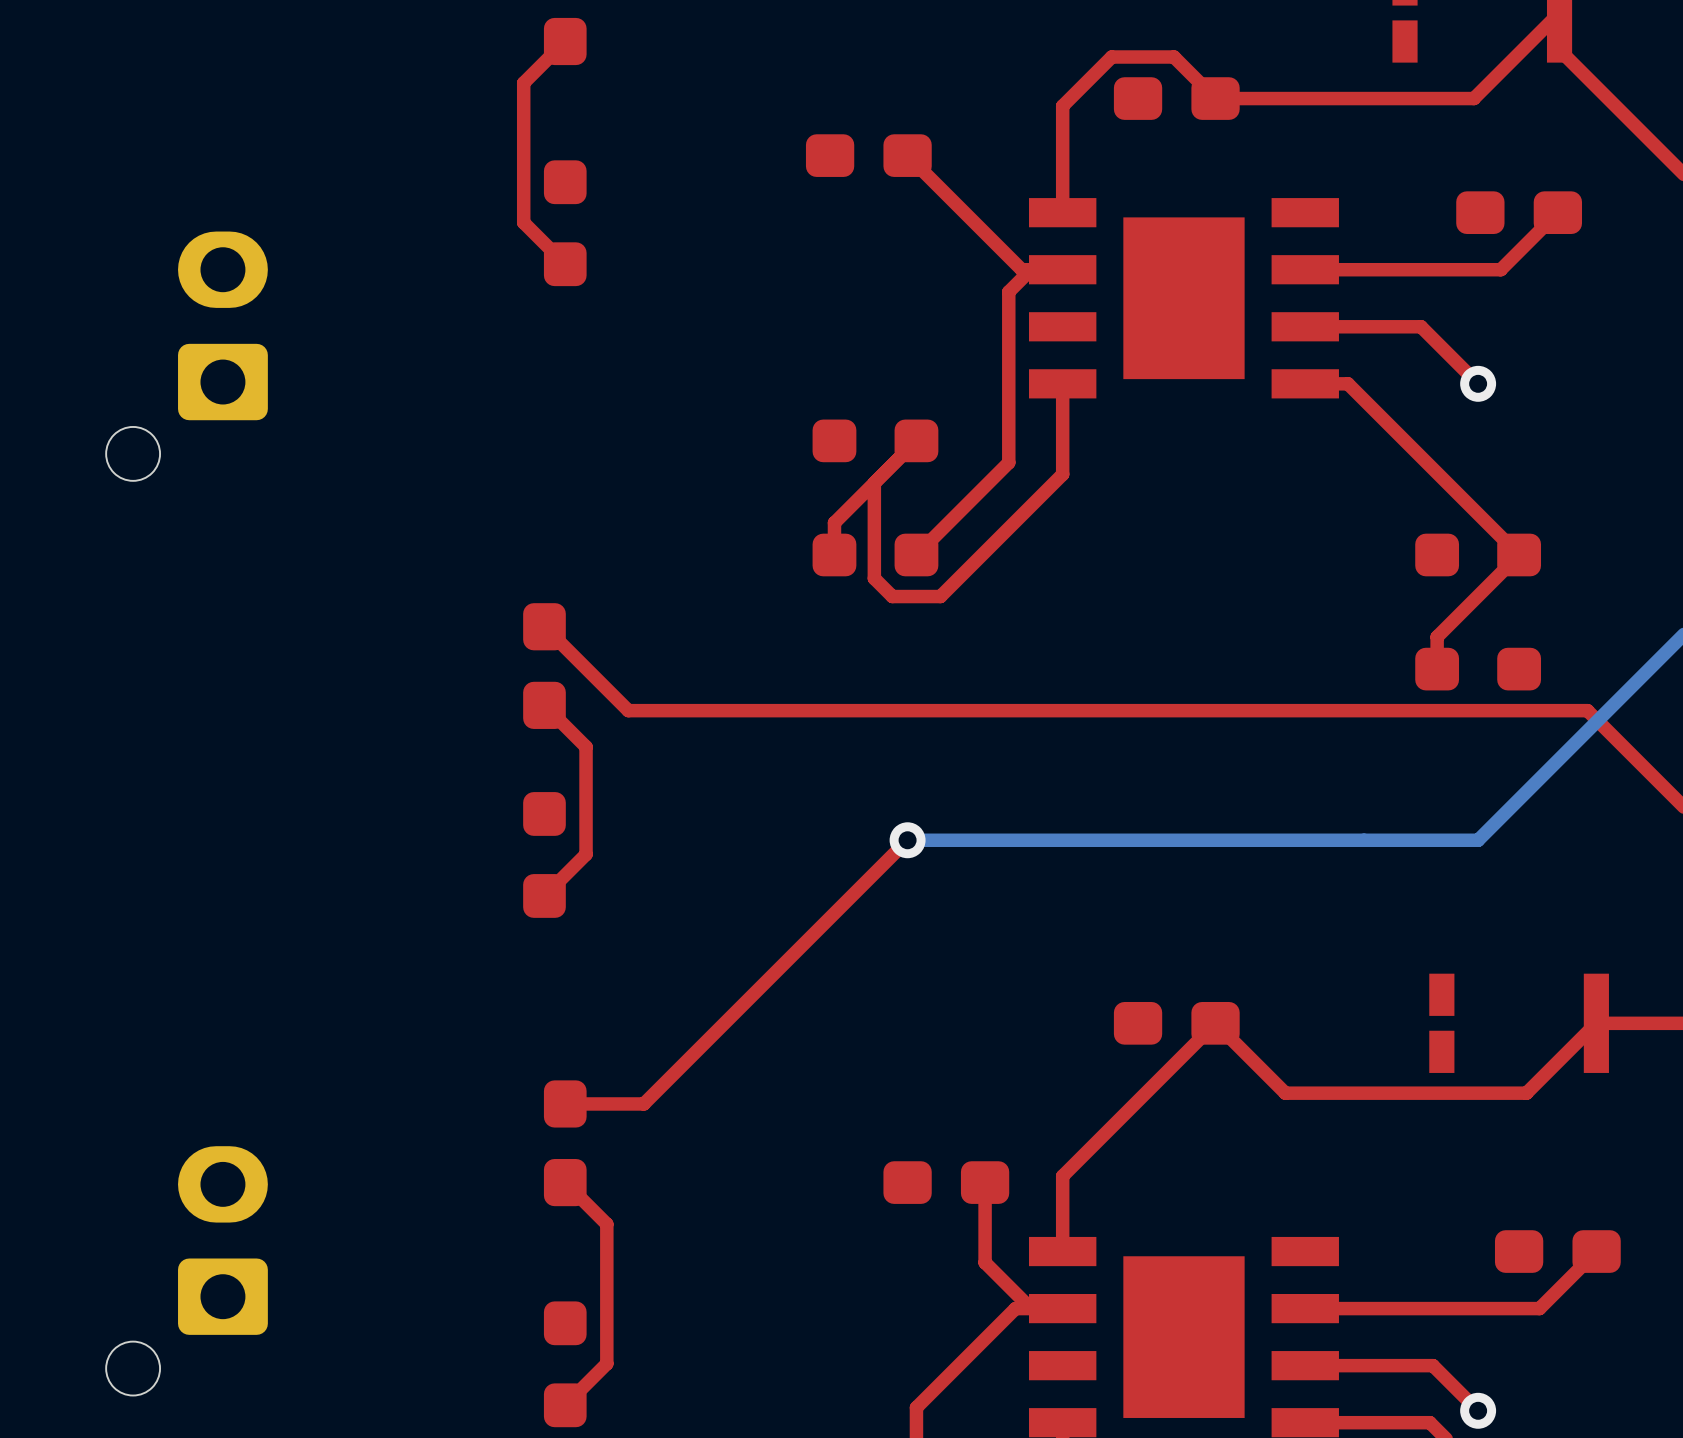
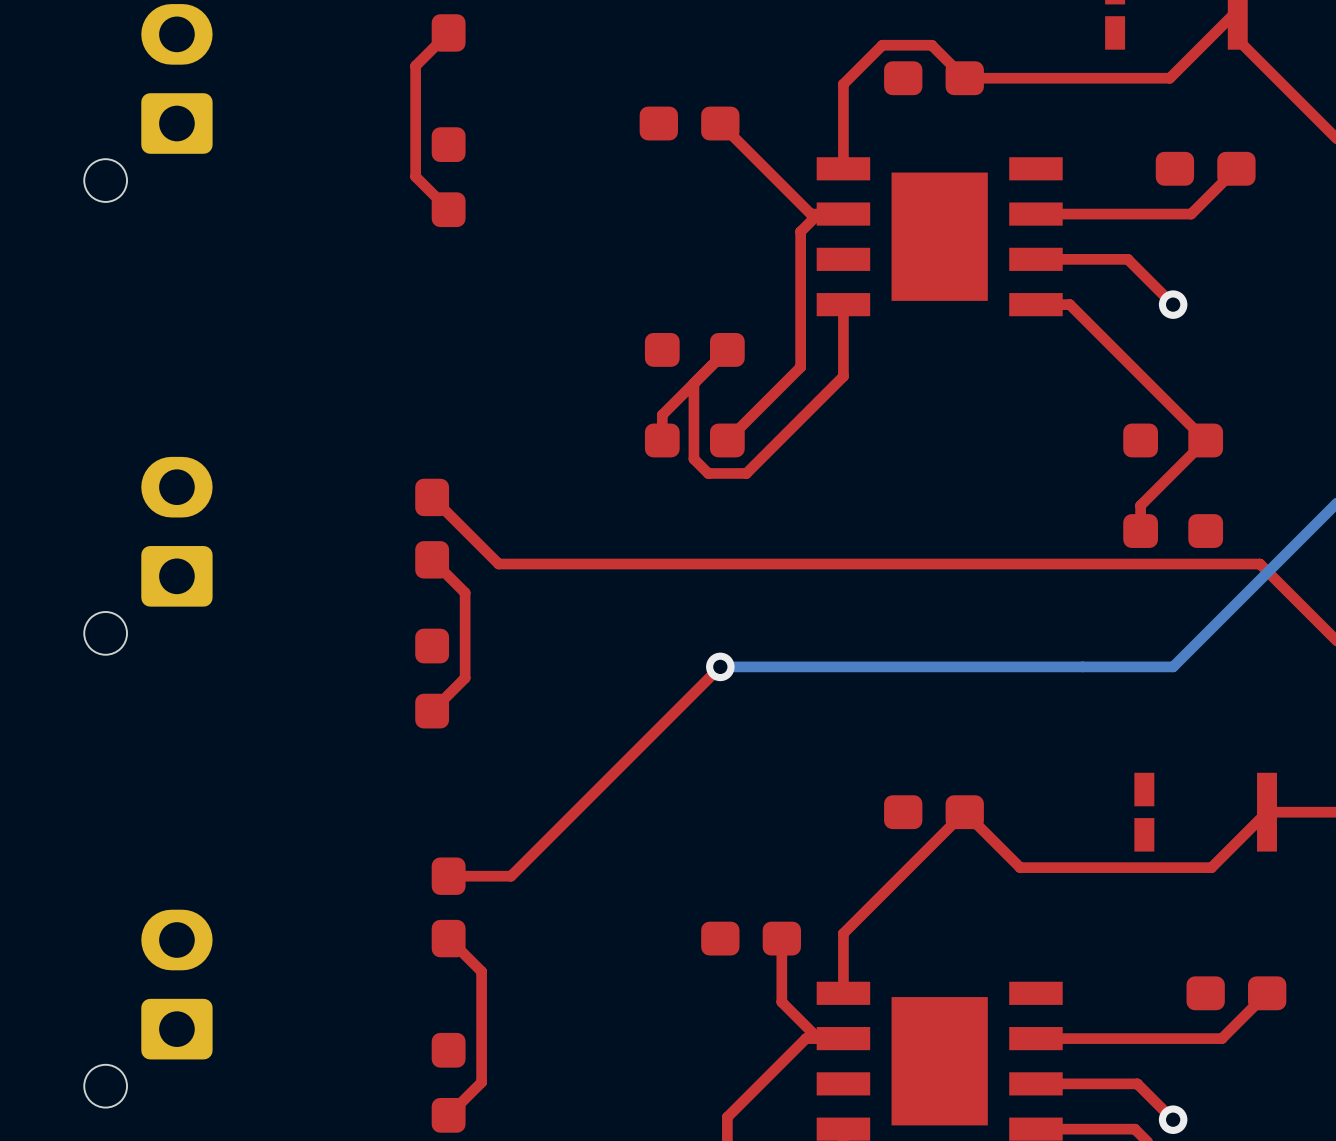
part: none -> (148, 103)
part: (187, 356) -> none
part: none -> (148, 555)

